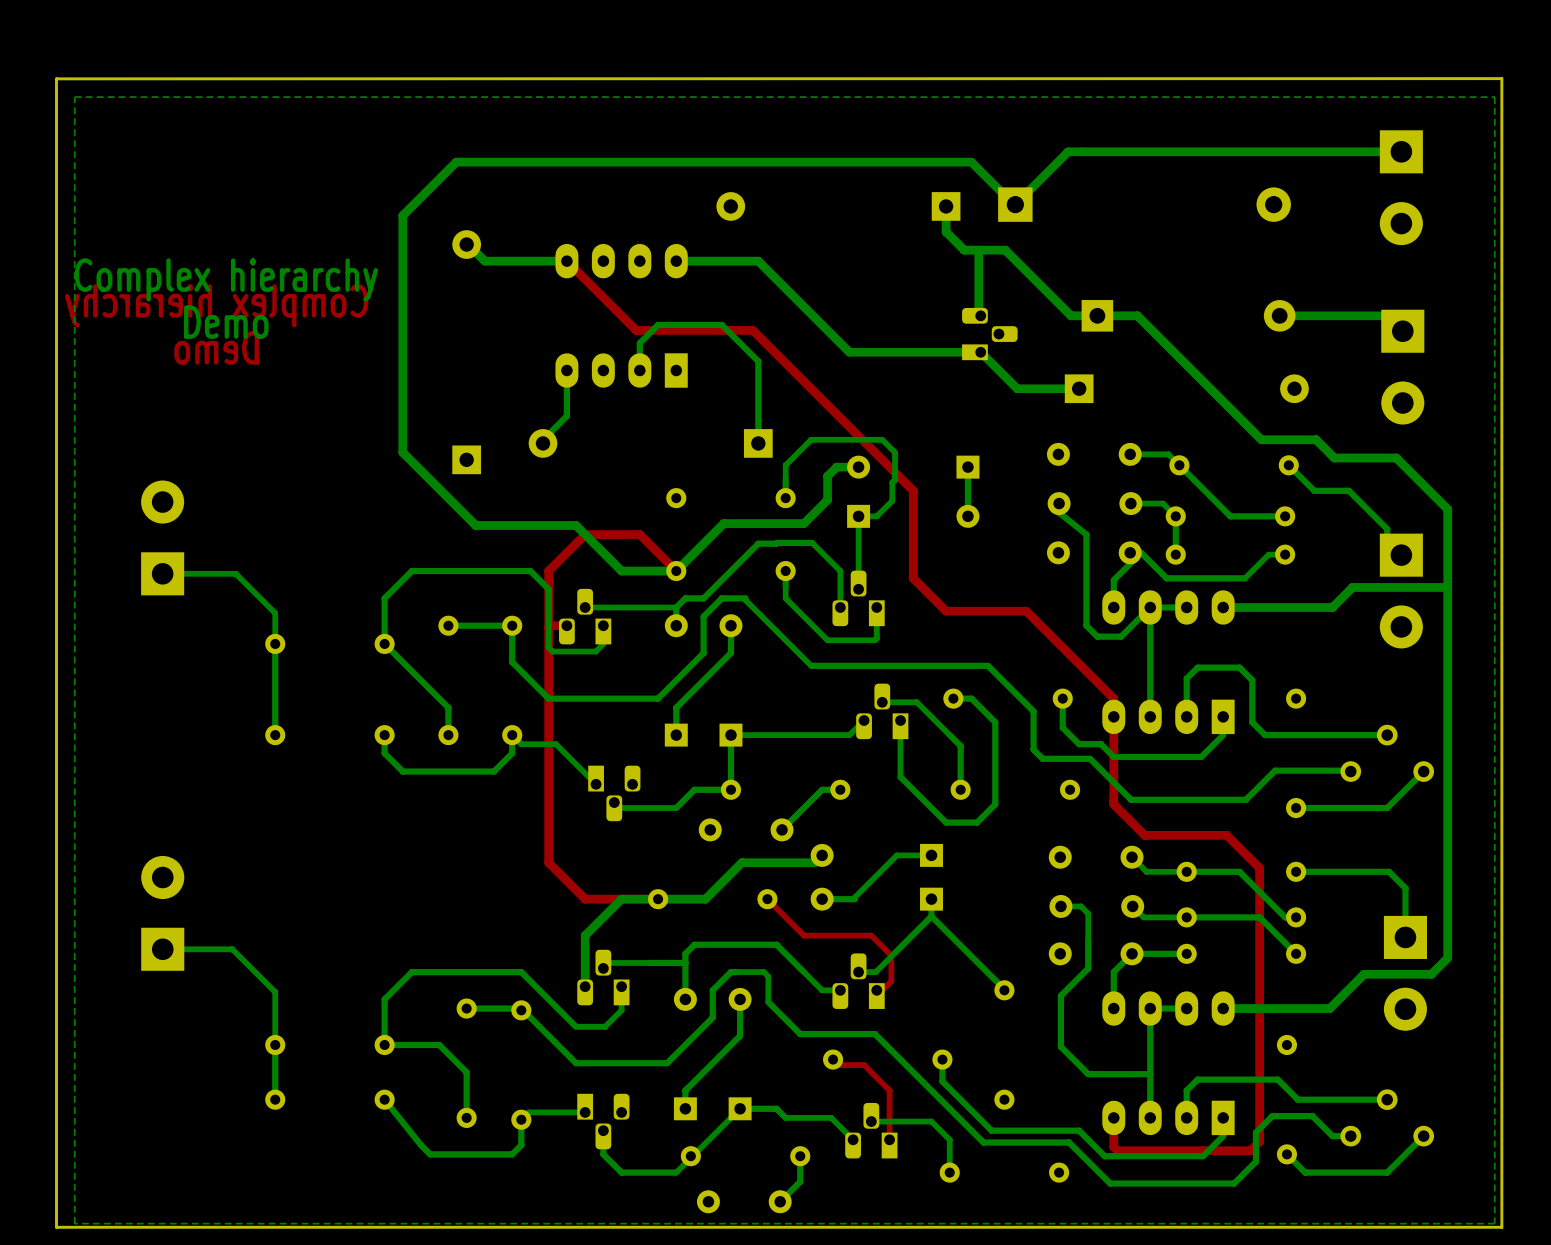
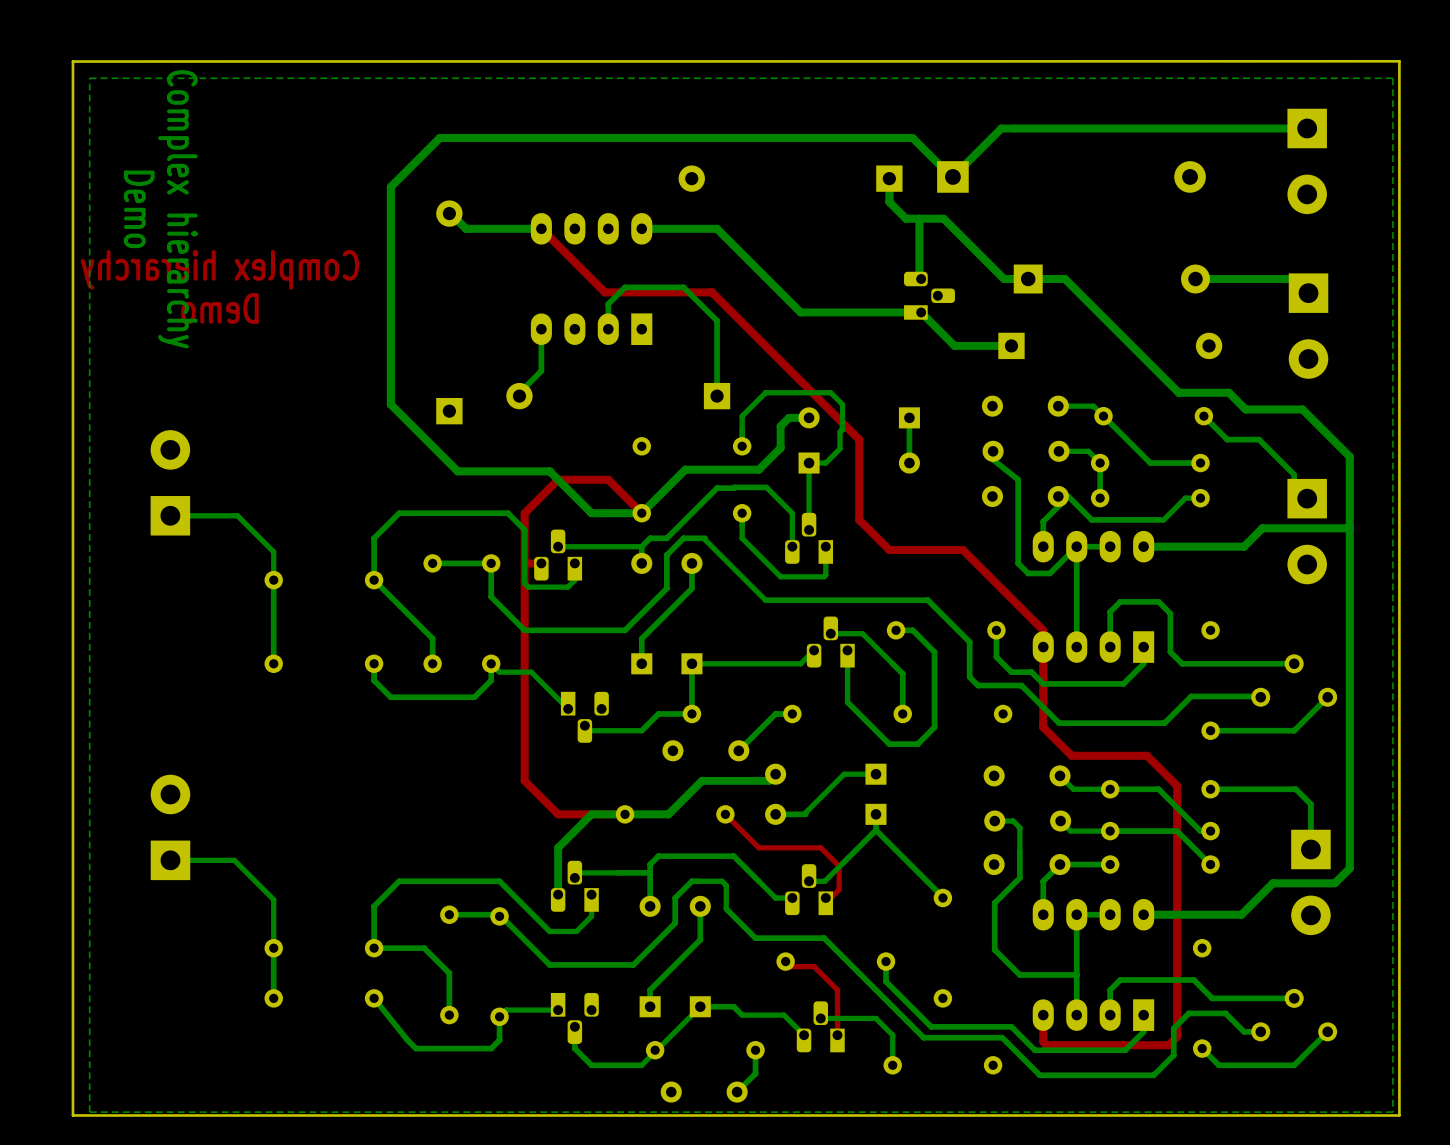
text rotation: 0° (226, 279) -> 90° clockwise (177, 209)
text rotation: 0° (226, 322) -> 90° clockwise (139, 209)
text position: Demo (226, 322) -> Demo (139, 209)

